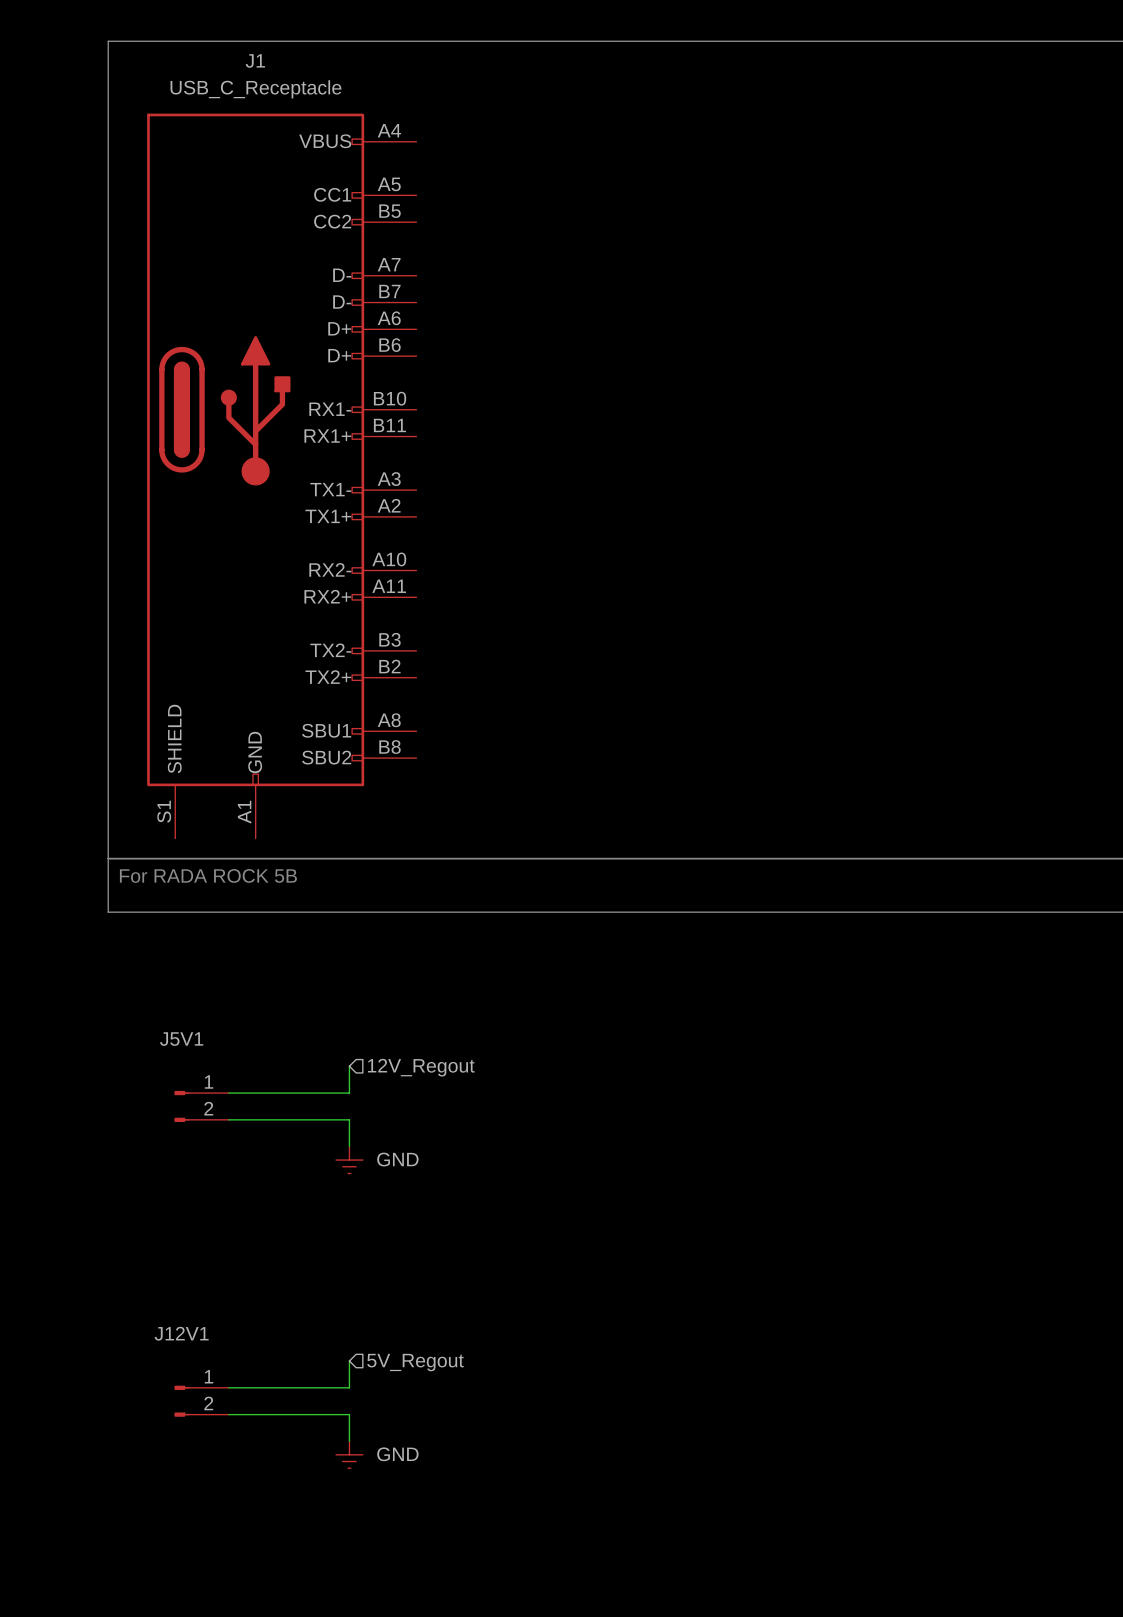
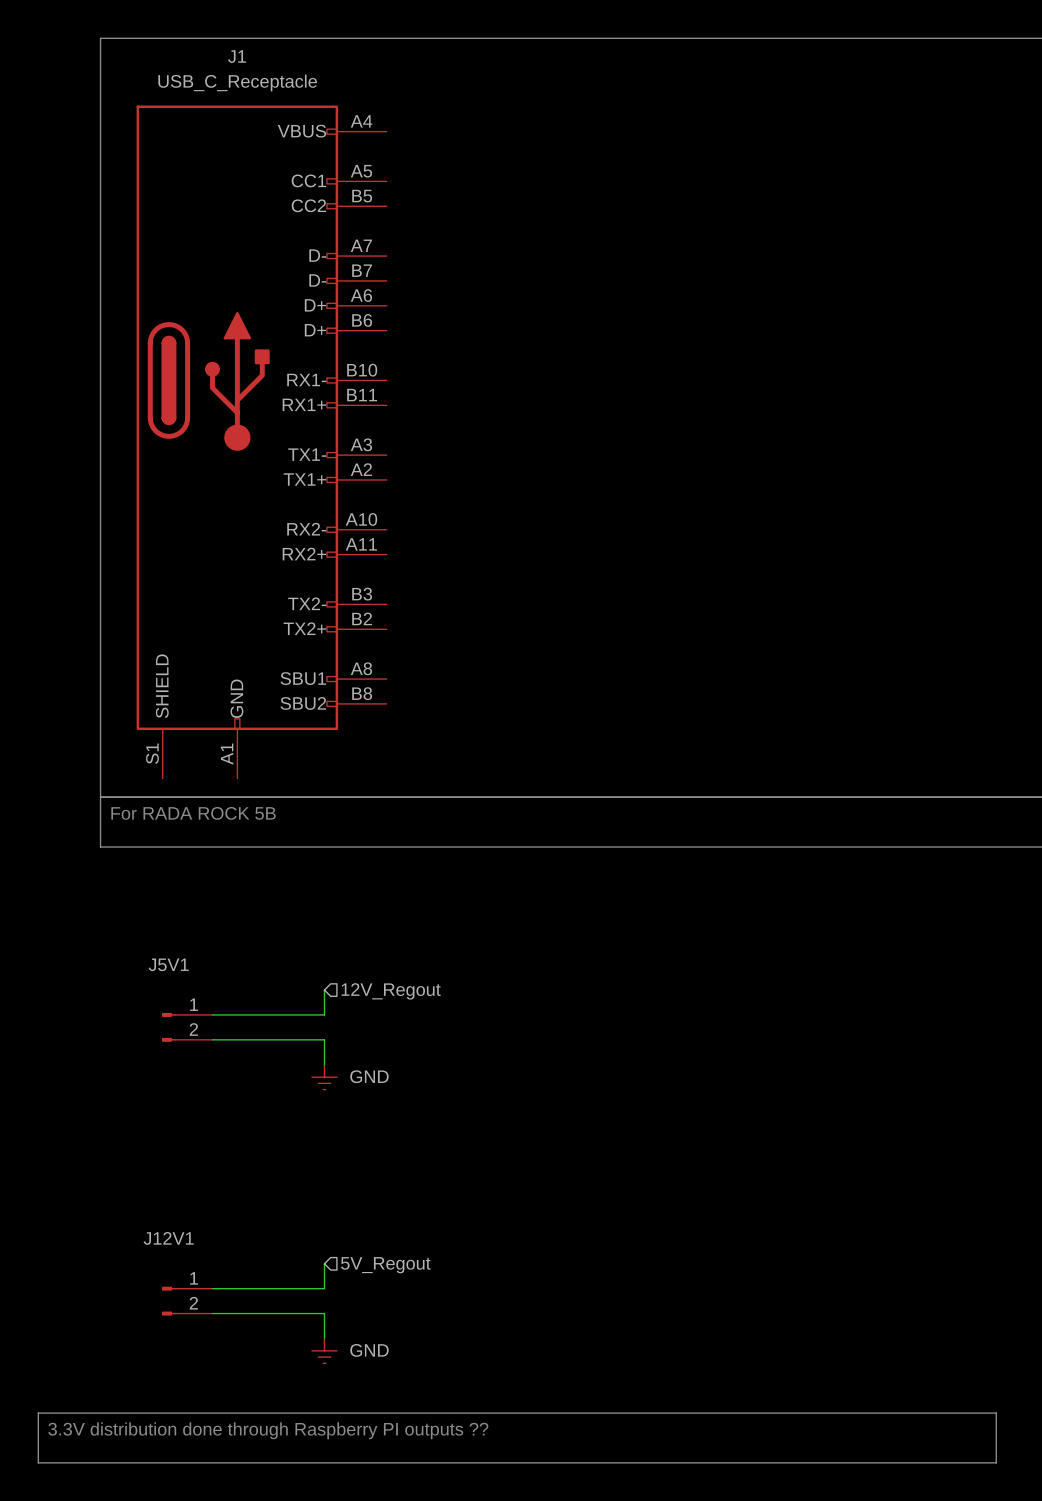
line: none -> (38, 1413) (996, 1413) (996, 1462) (38, 1462) (38, 1413)
text: none -> 3.3V distribution done through Raspberry PI outputs ?? (268, 1430)

